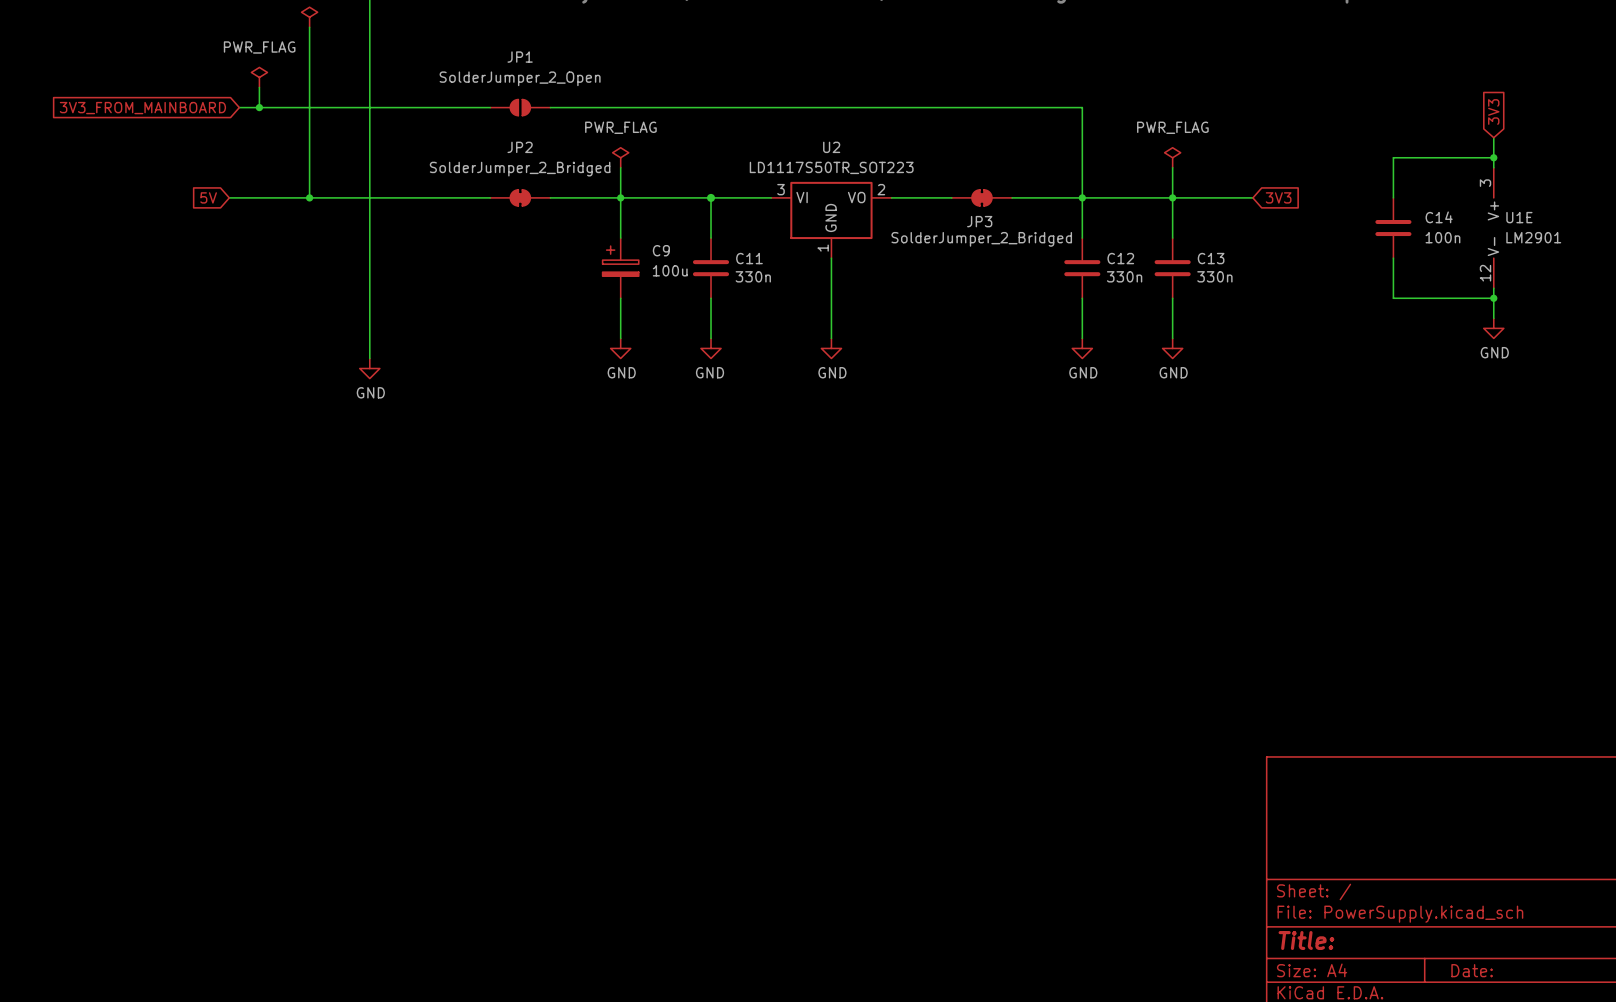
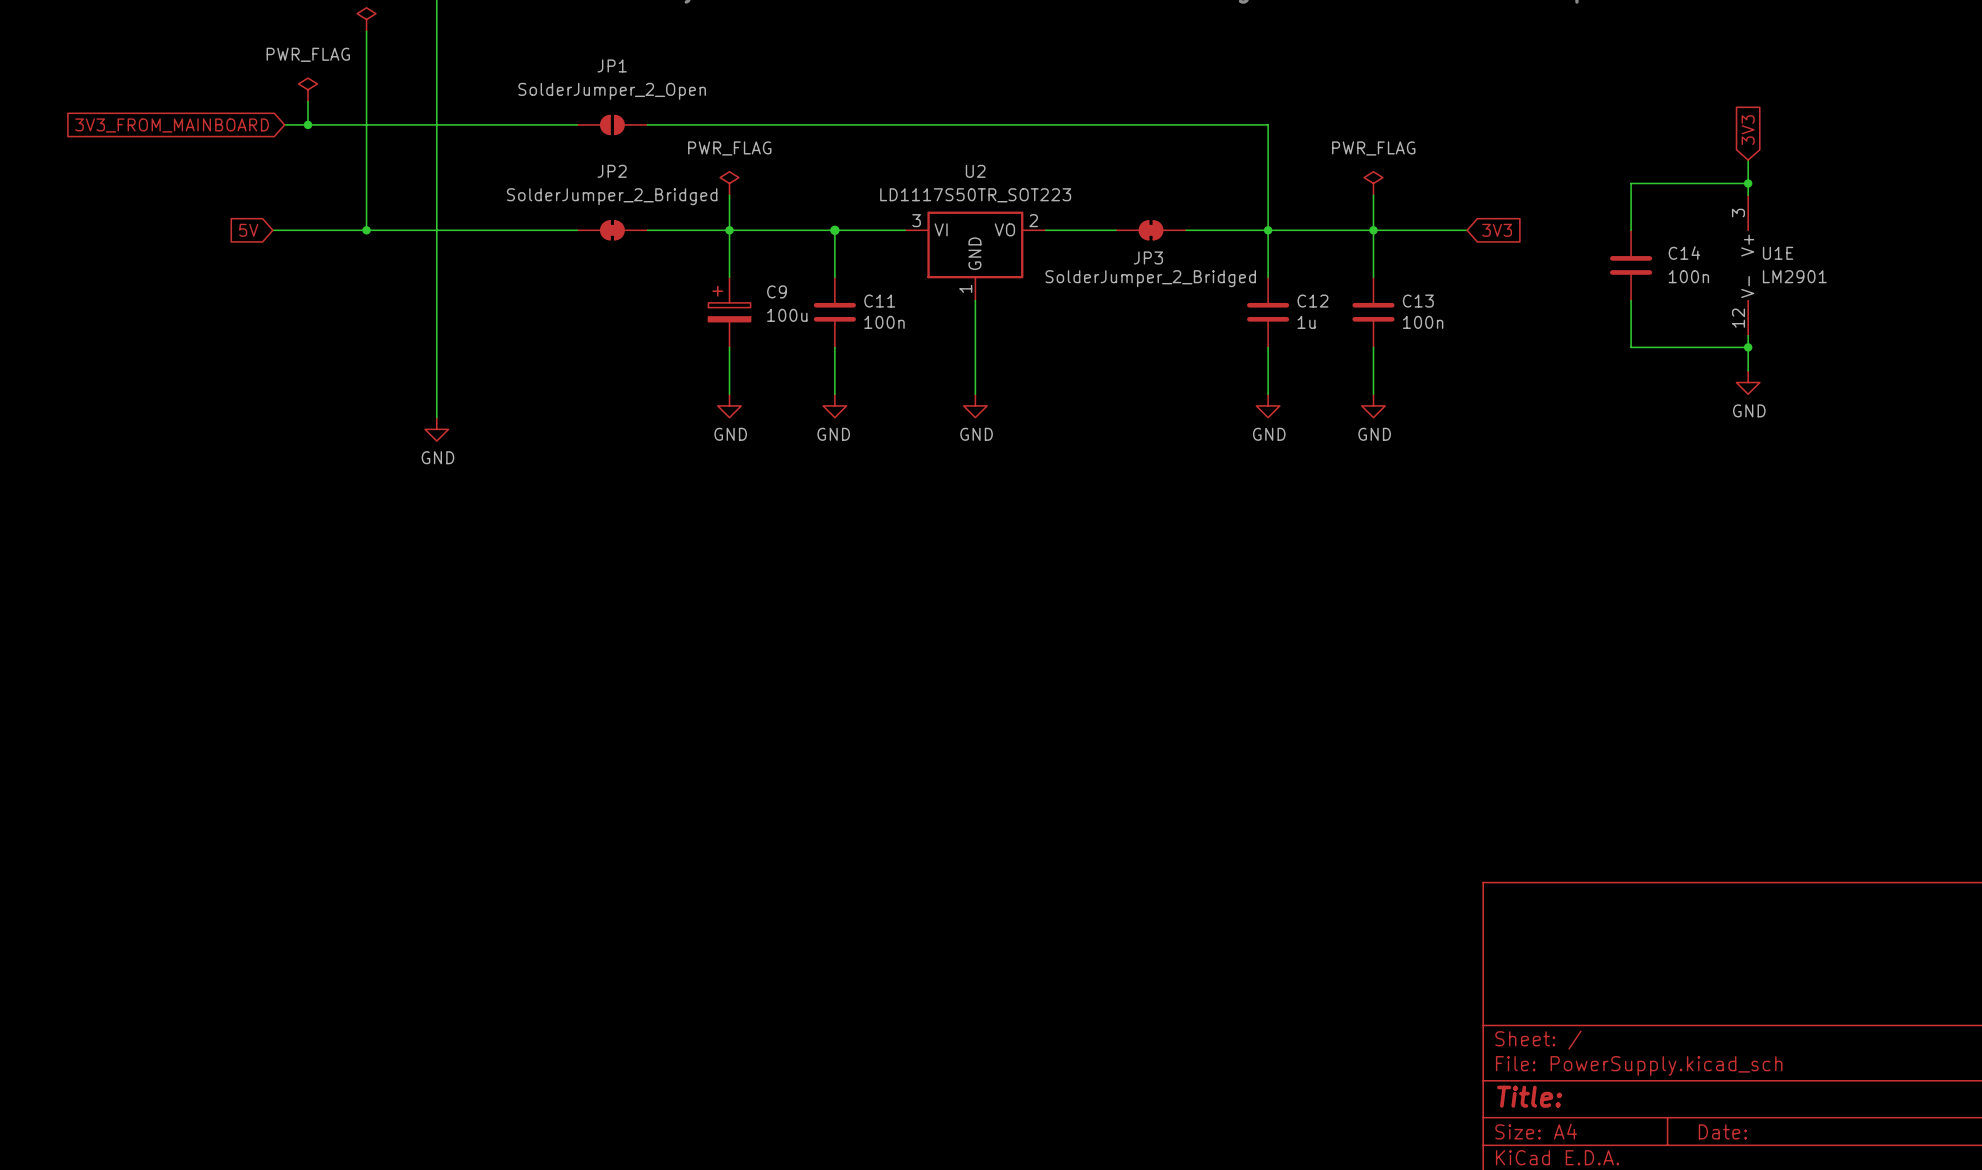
C11 value: 330n (753, 276) -> 100n (884, 322)
C12 value: 330n (1124, 276) -> 1u (1306, 322)
C13 value: 330n (1214, 276) -> 100n (1423, 322)

